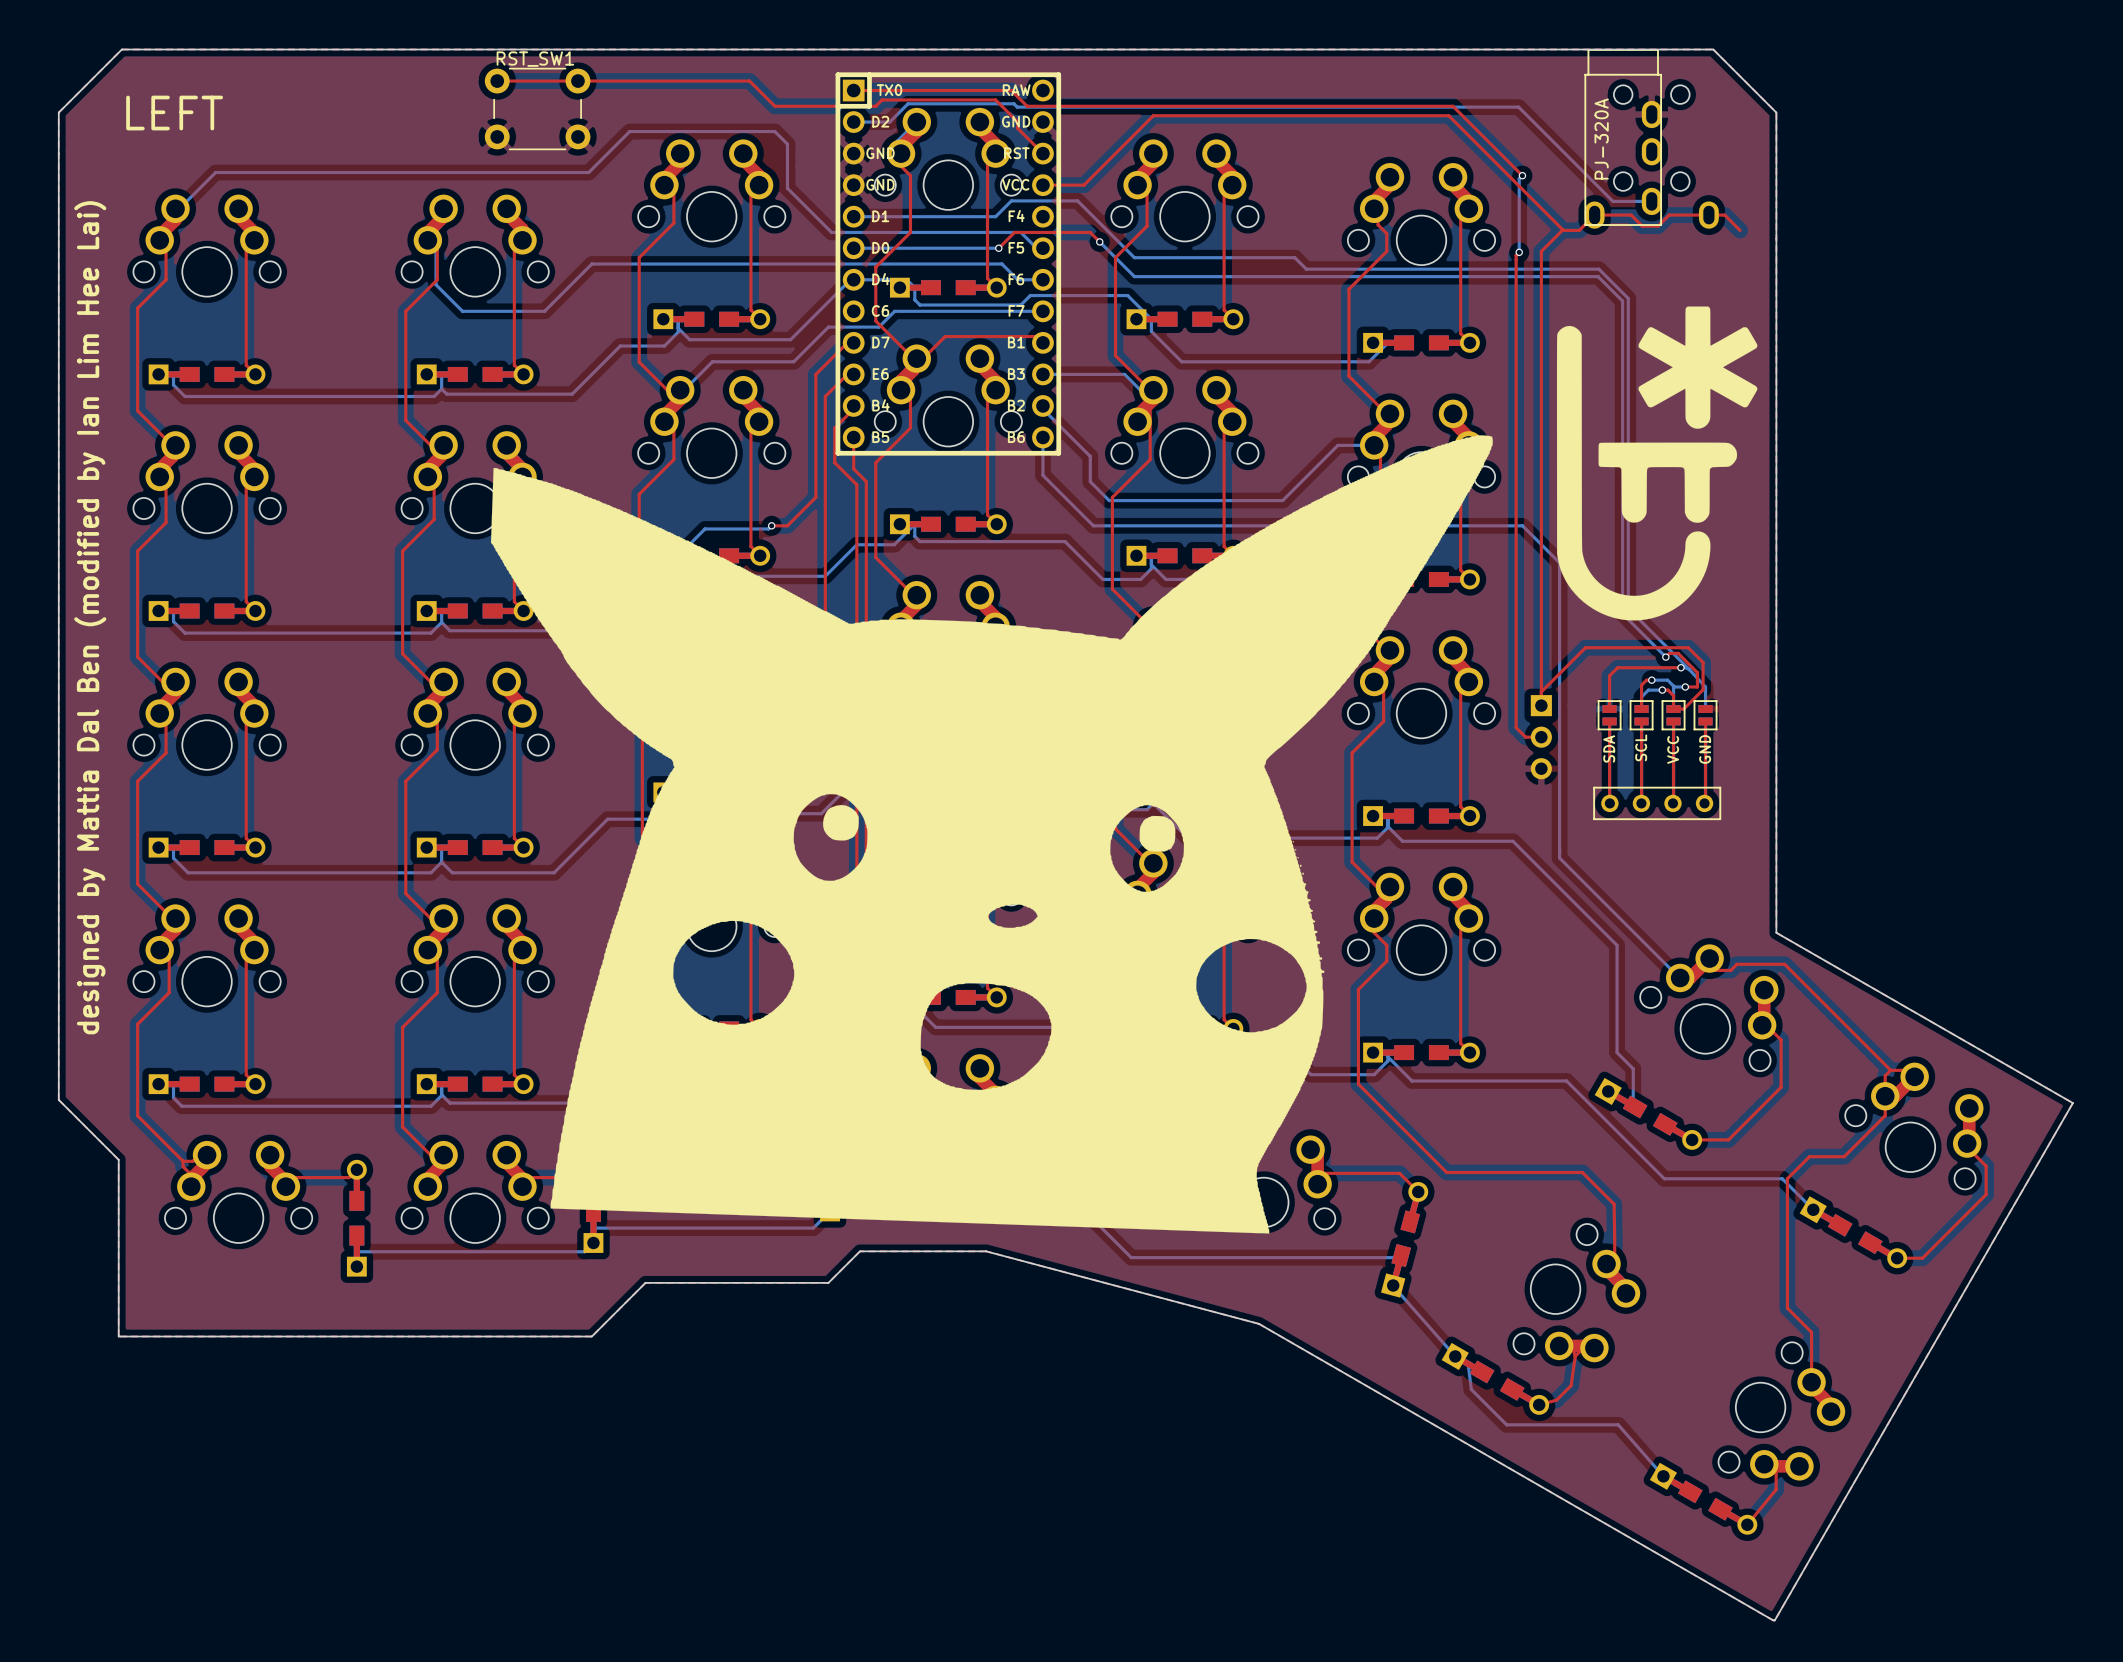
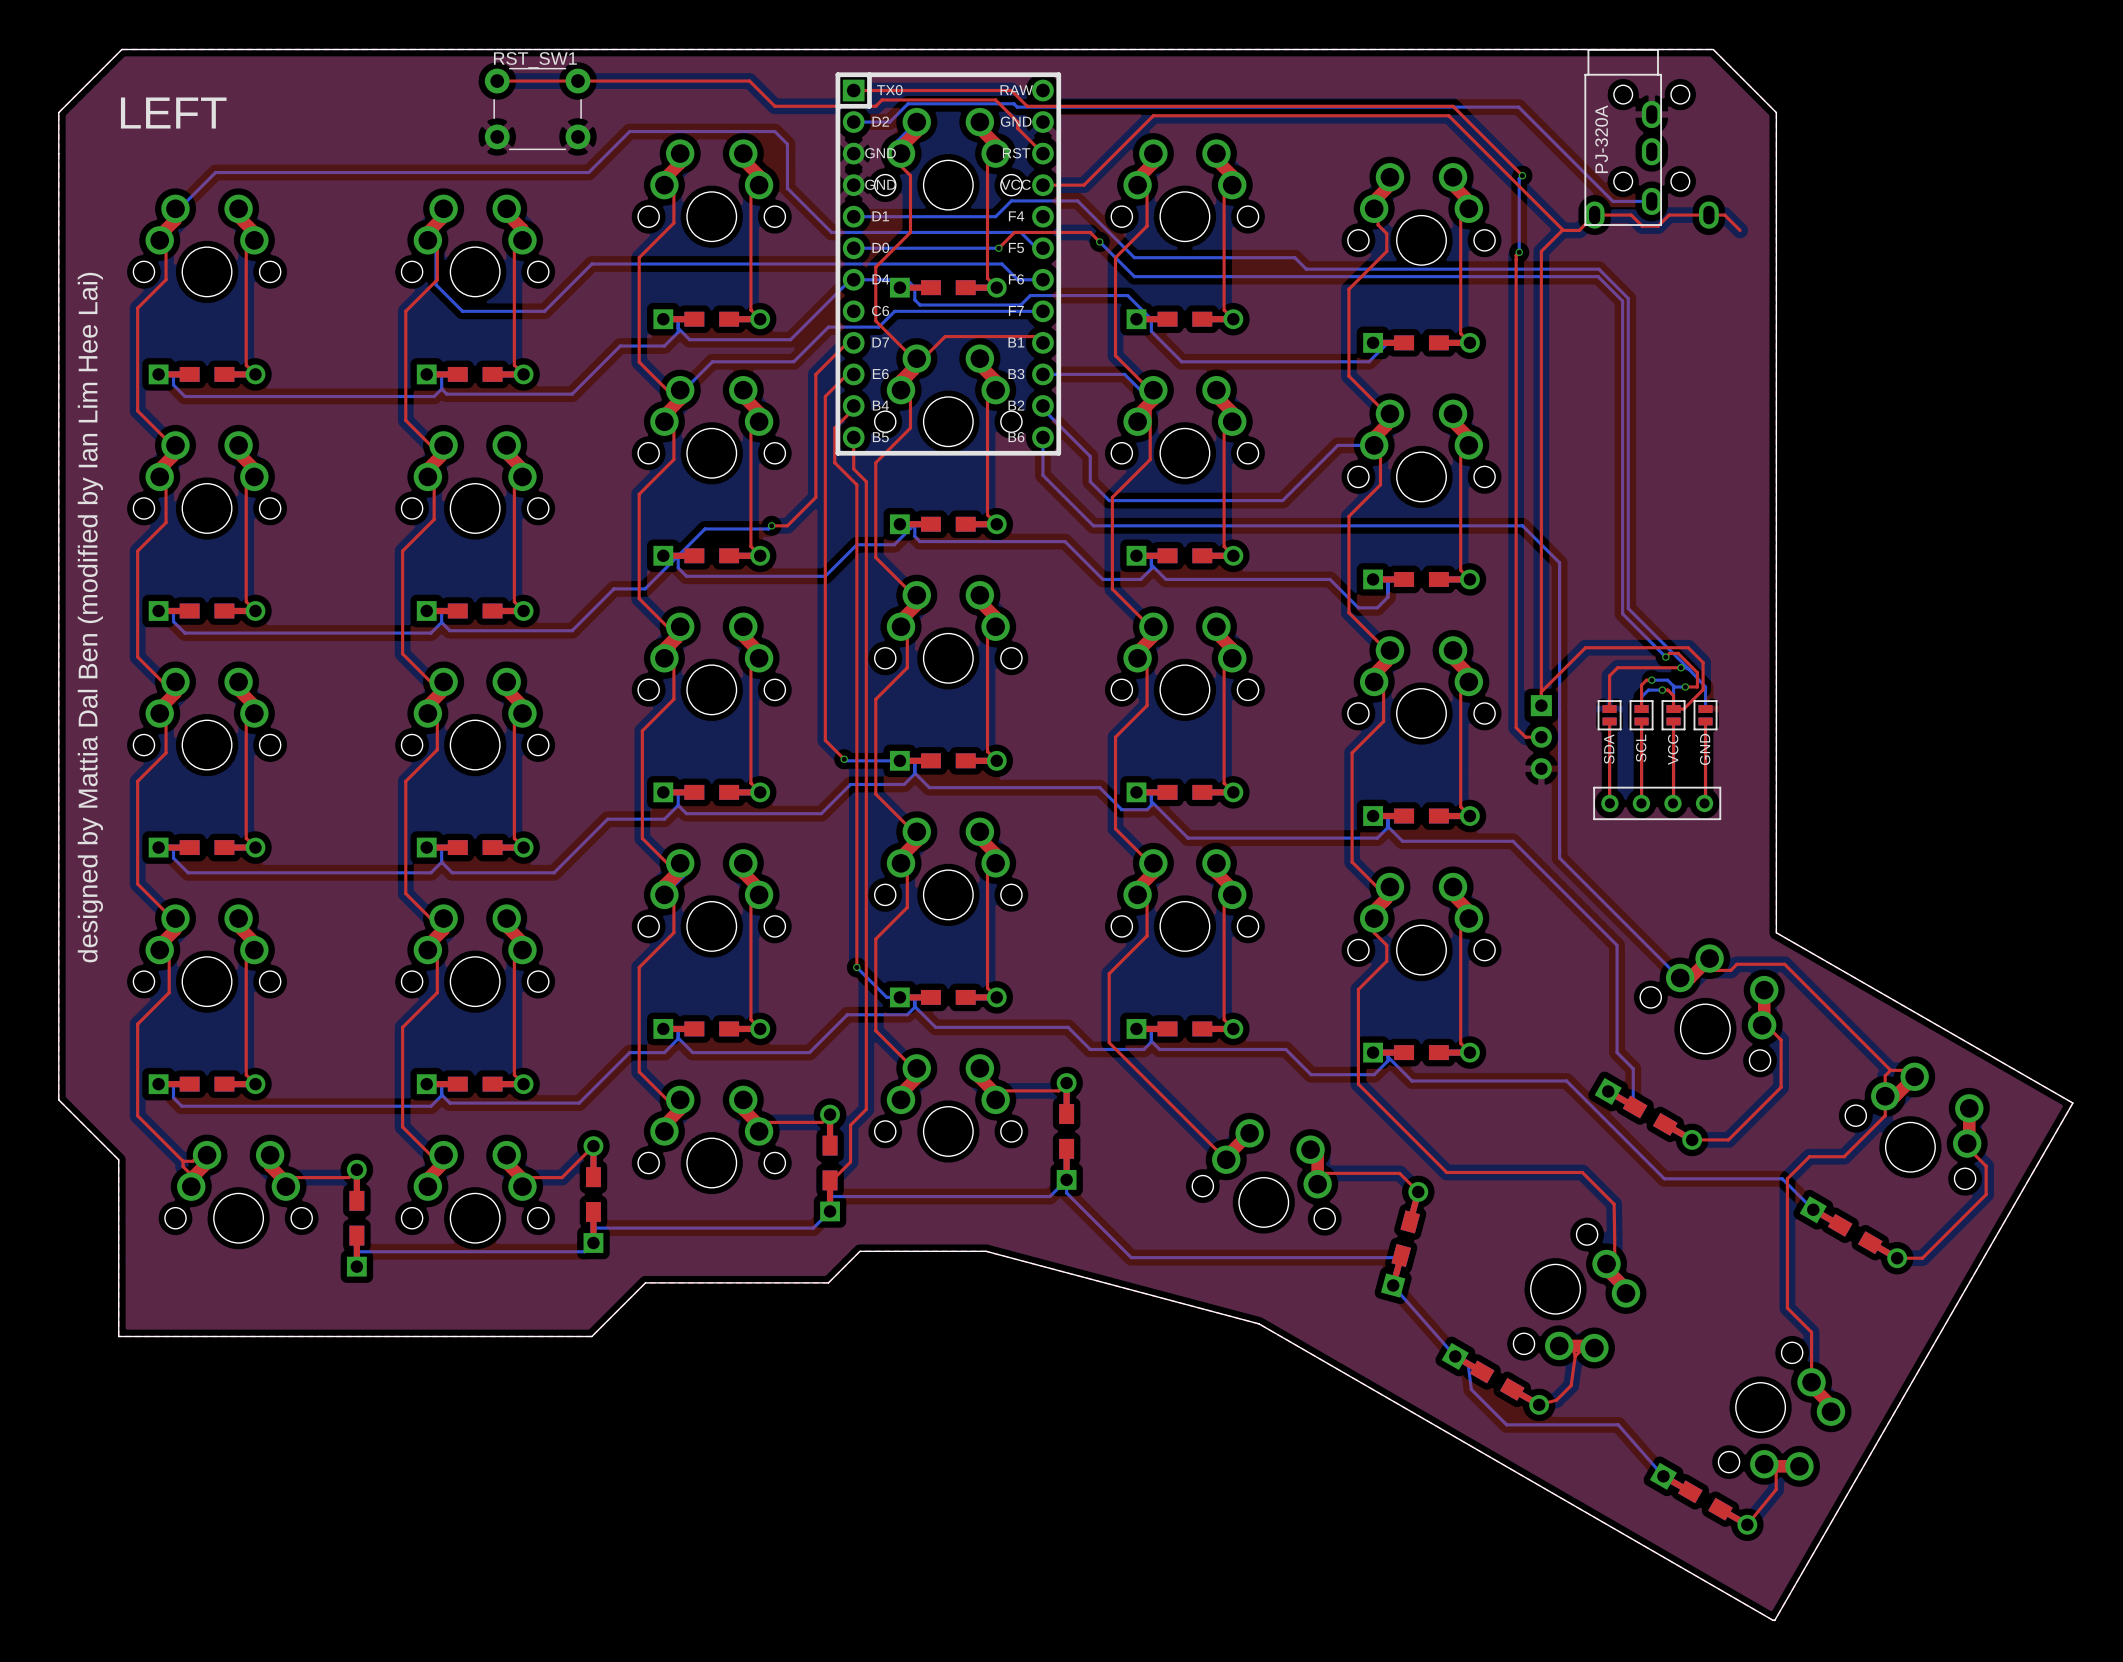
drawing: [1556, 306, 1758, 621] -> none
drawing: [490, 435, 1493, 1234] -> none

